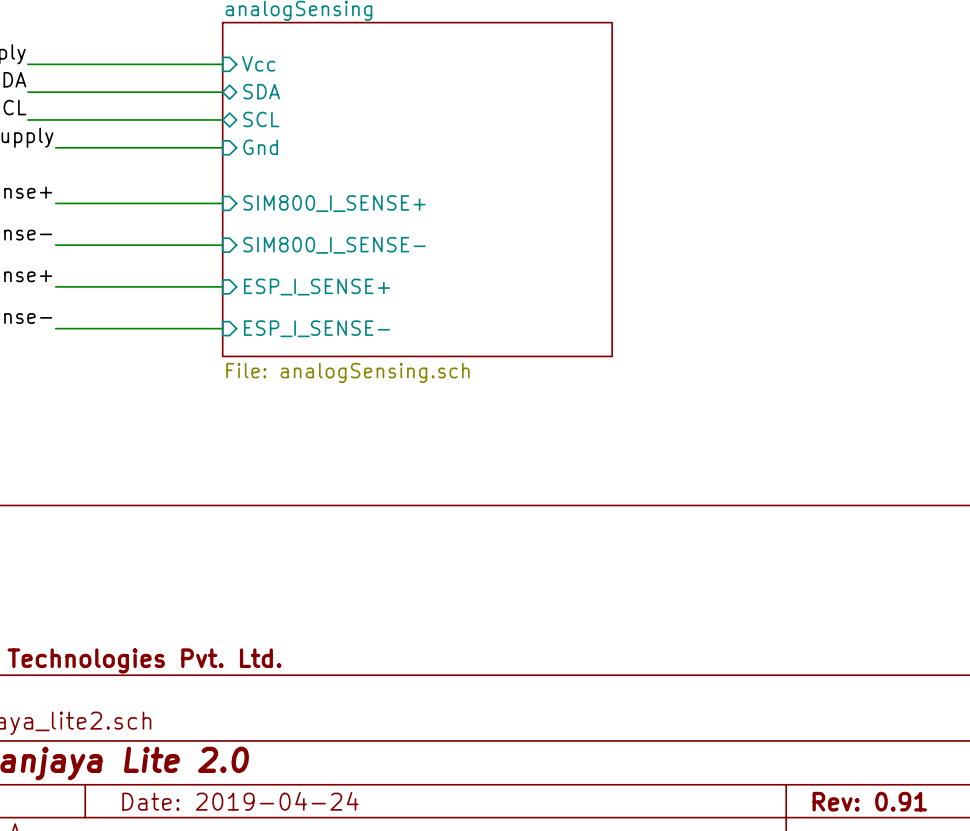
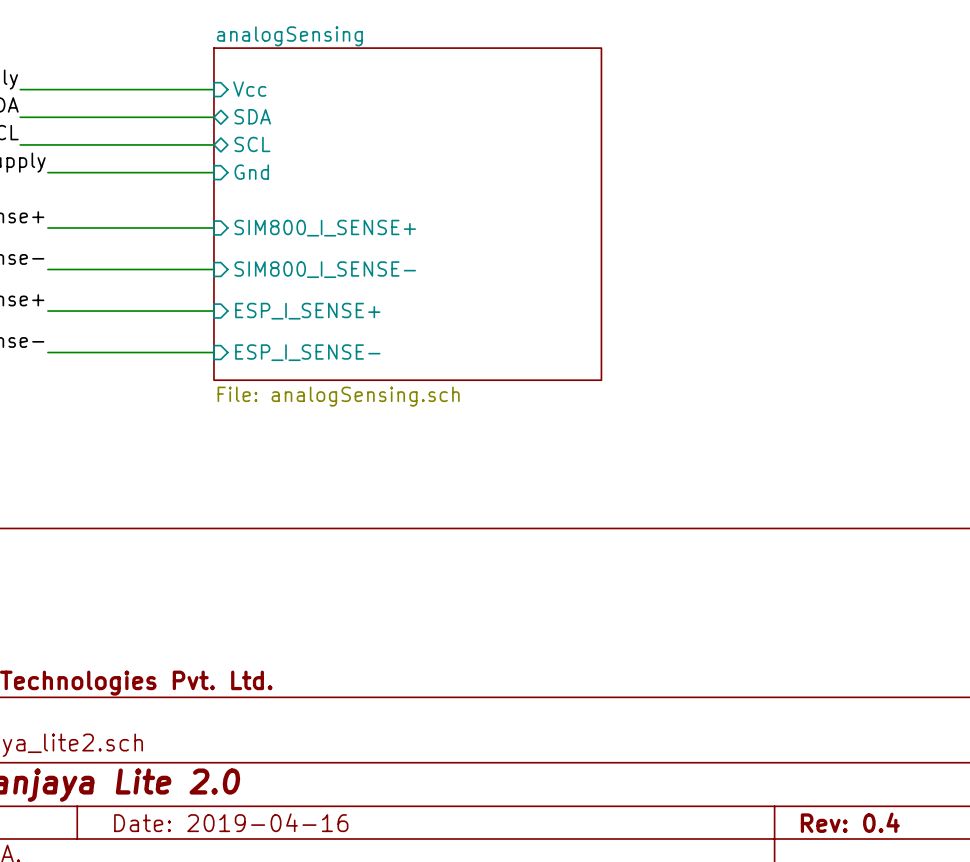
title block: Date: 2019-04-24 (240, 801) -> Date: 2019-04-16 (231, 822)
title block: Rev: 0.91 (869, 801) -> Rev: 0.4 (850, 822)

